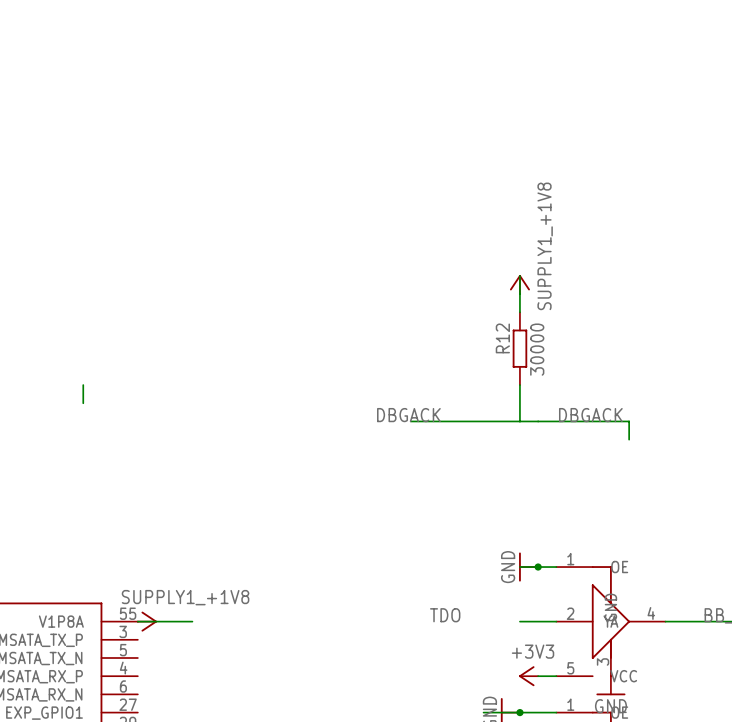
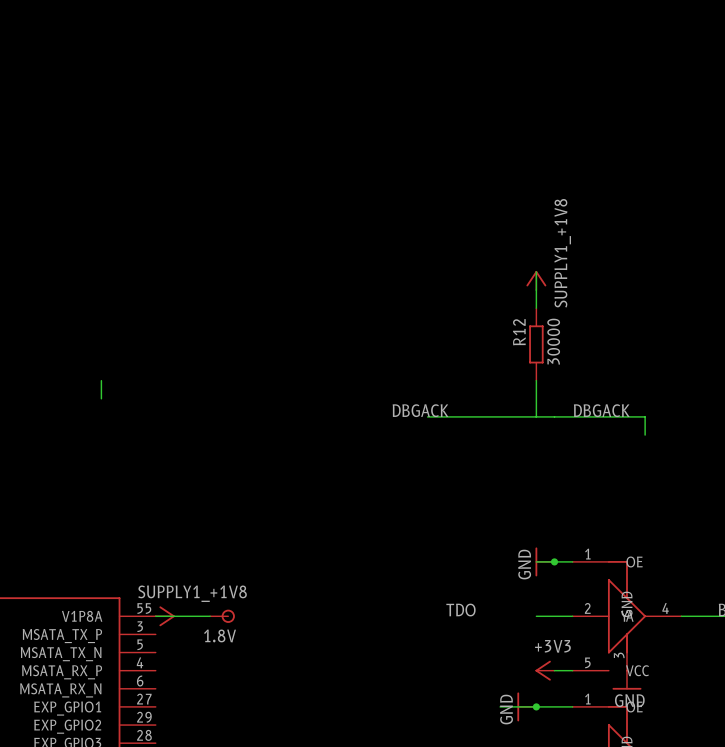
1.8V: none -> (222, 616)

